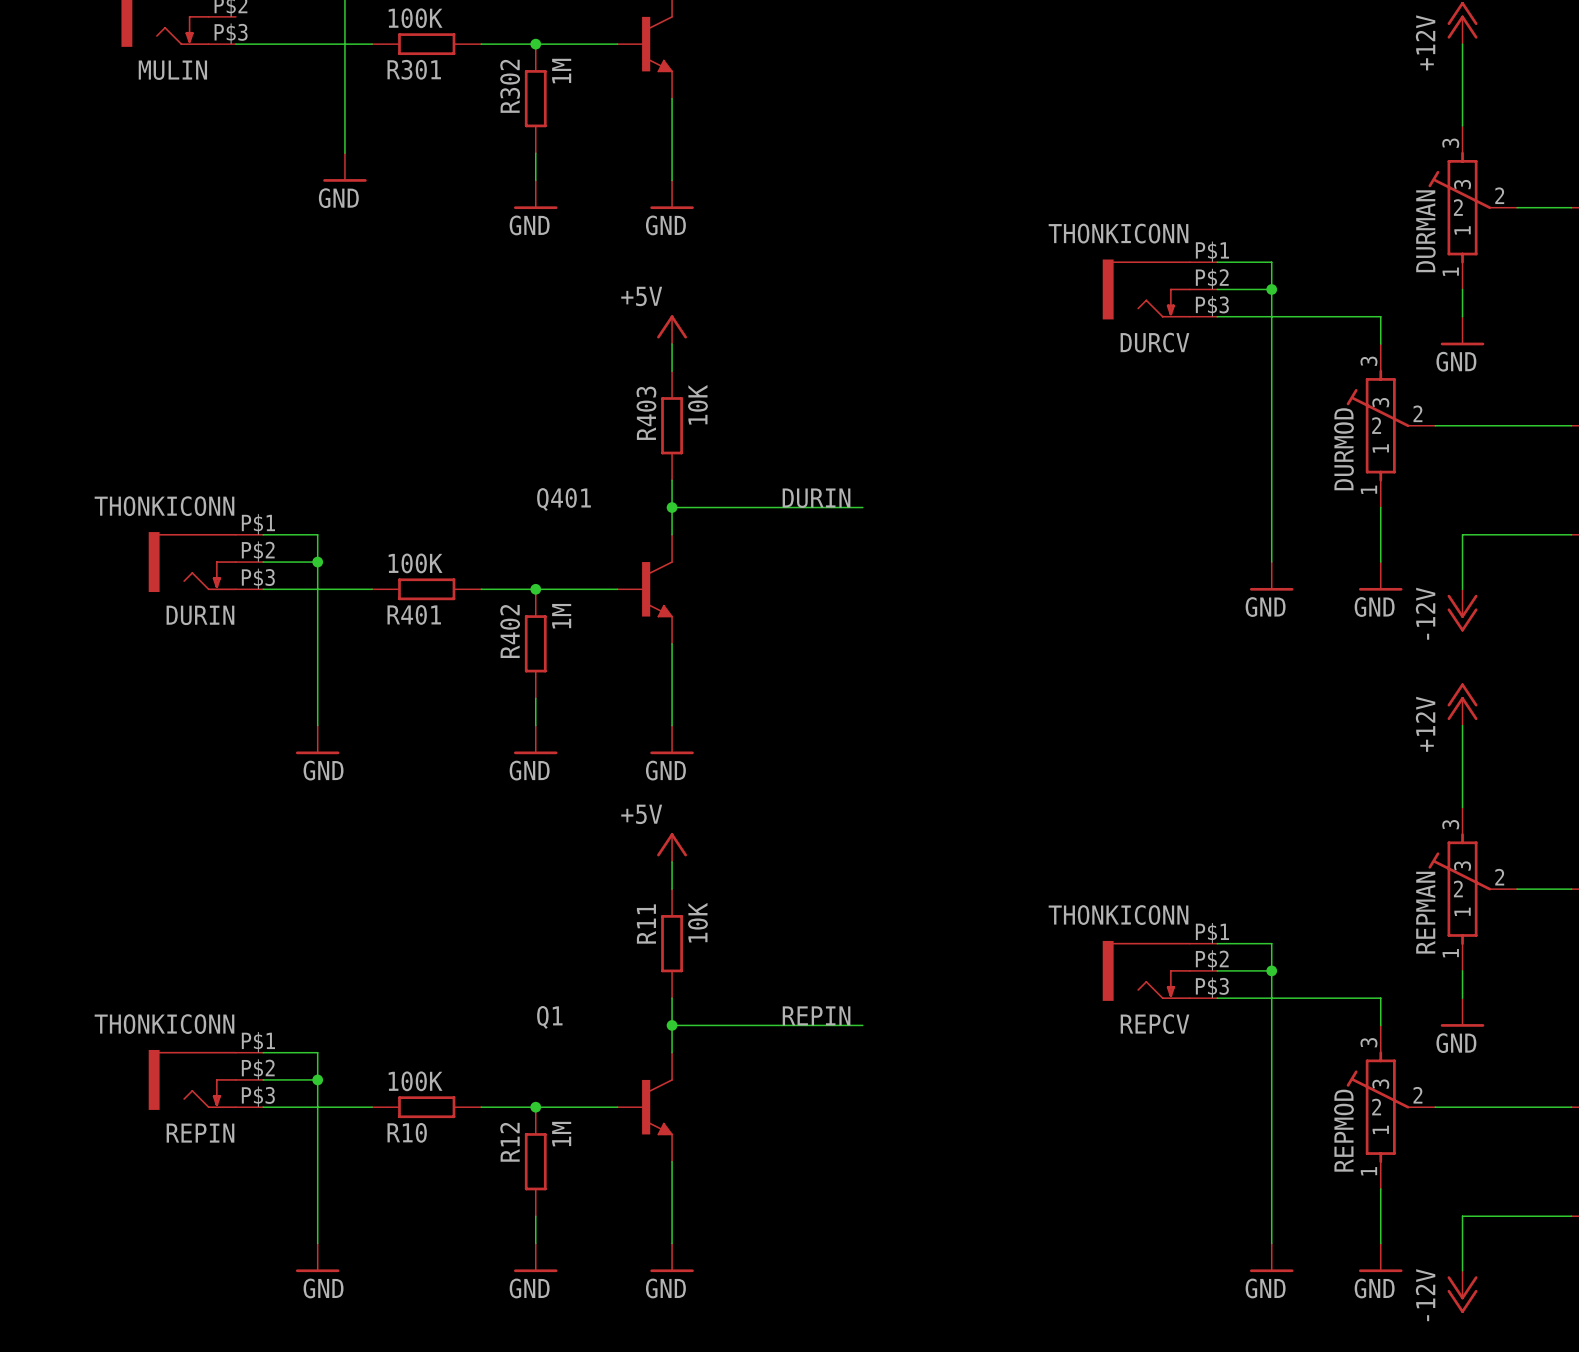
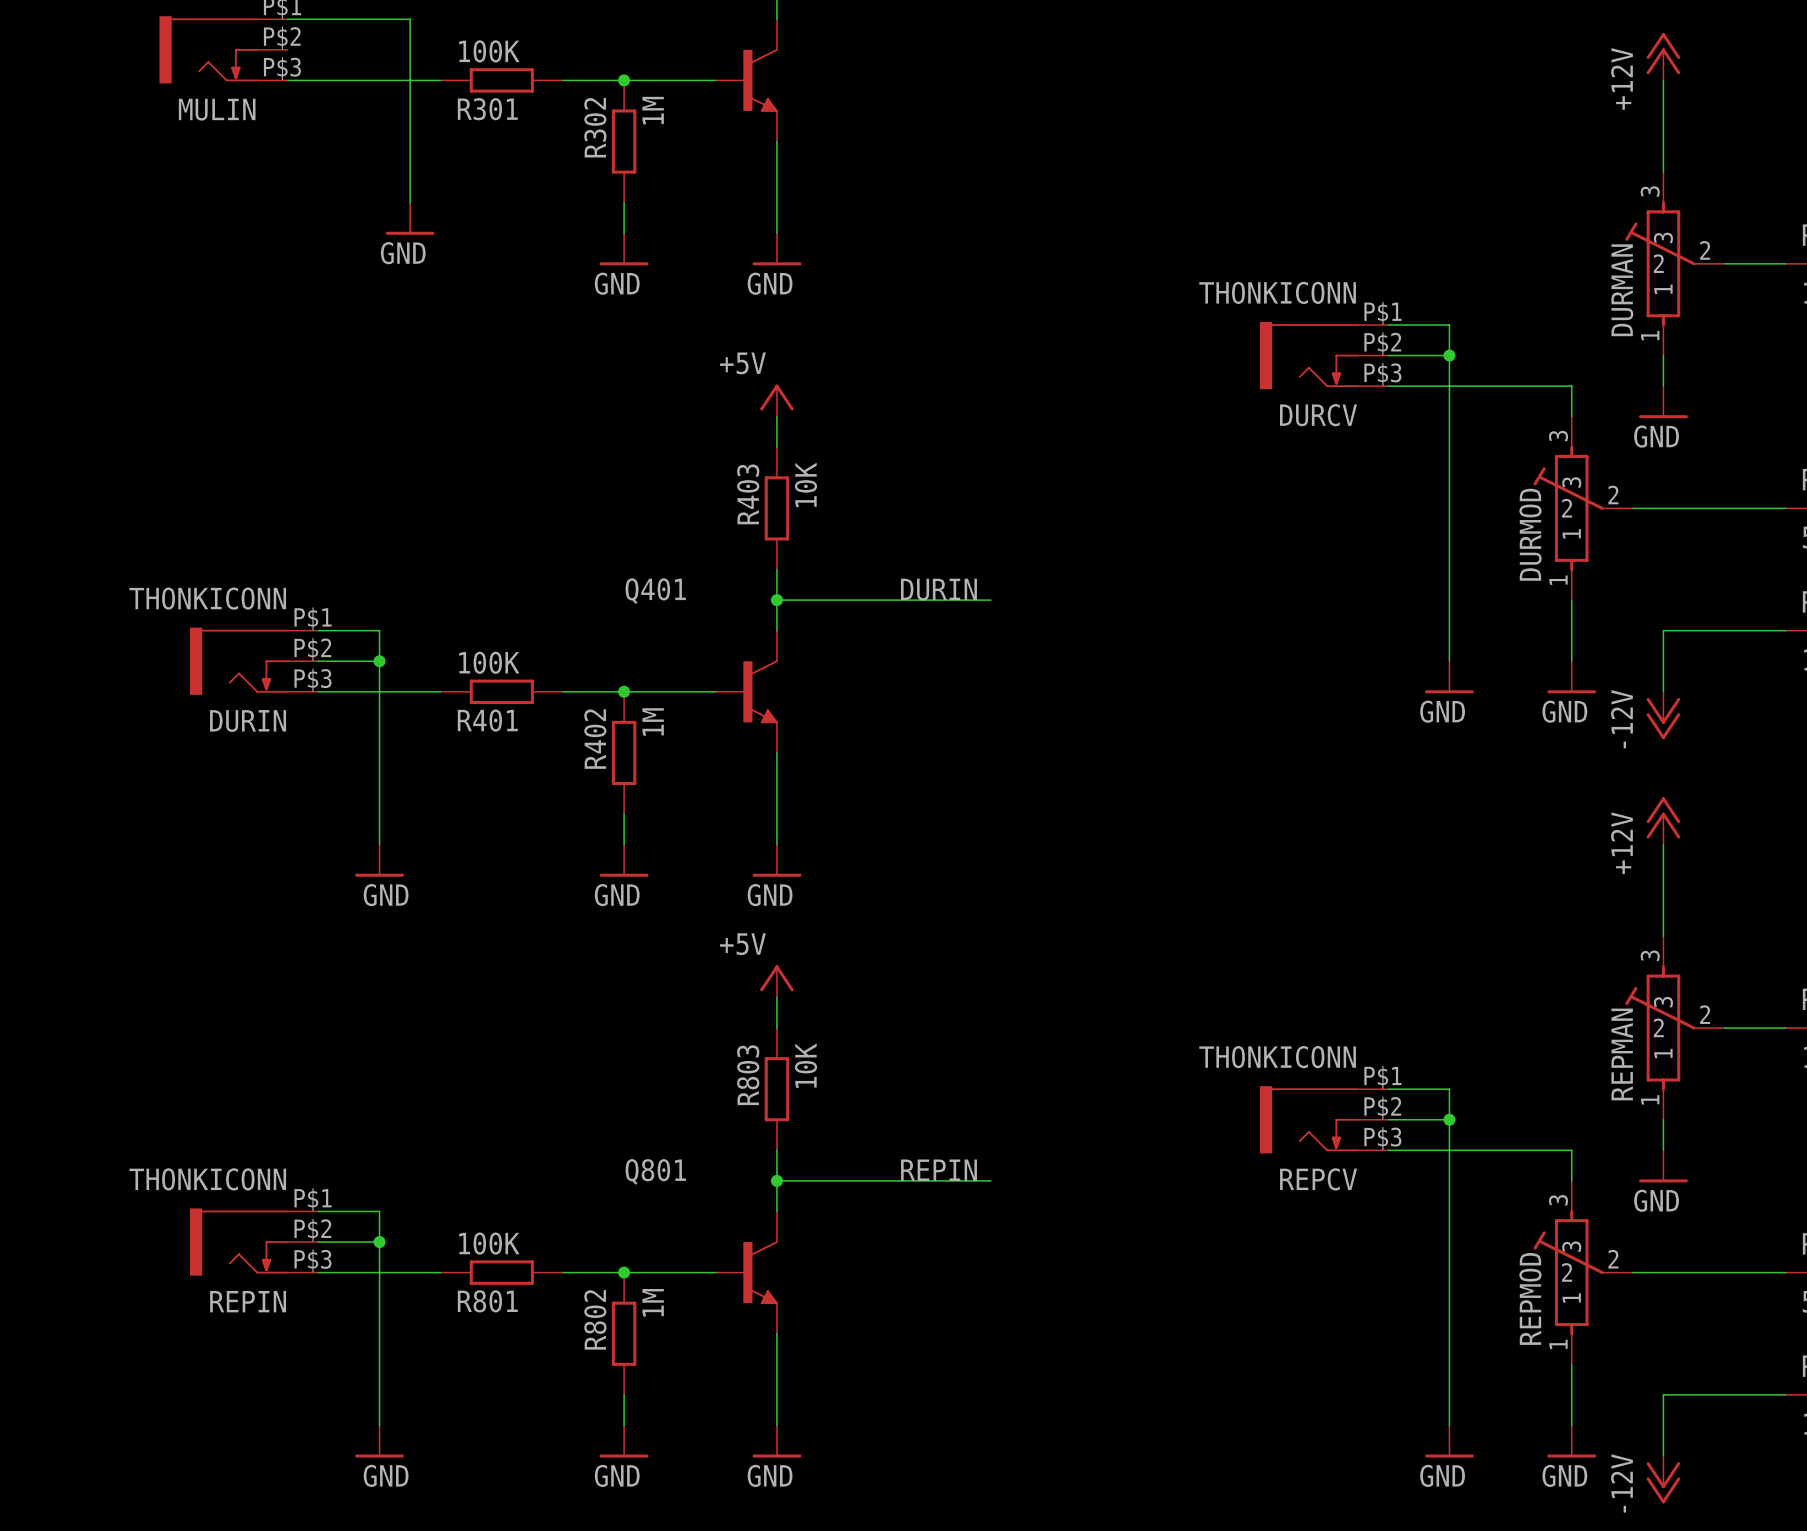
R11 name: R11 (646, 924) -> R803 (748, 1075)
Q1 name: Q1 (549, 1017) -> Q801 (655, 1171)
R10 name: R10 (407, 1132) -> R801 (487, 1301)
R12 name: R12 (509, 1142) -> R802 (595, 1319)

